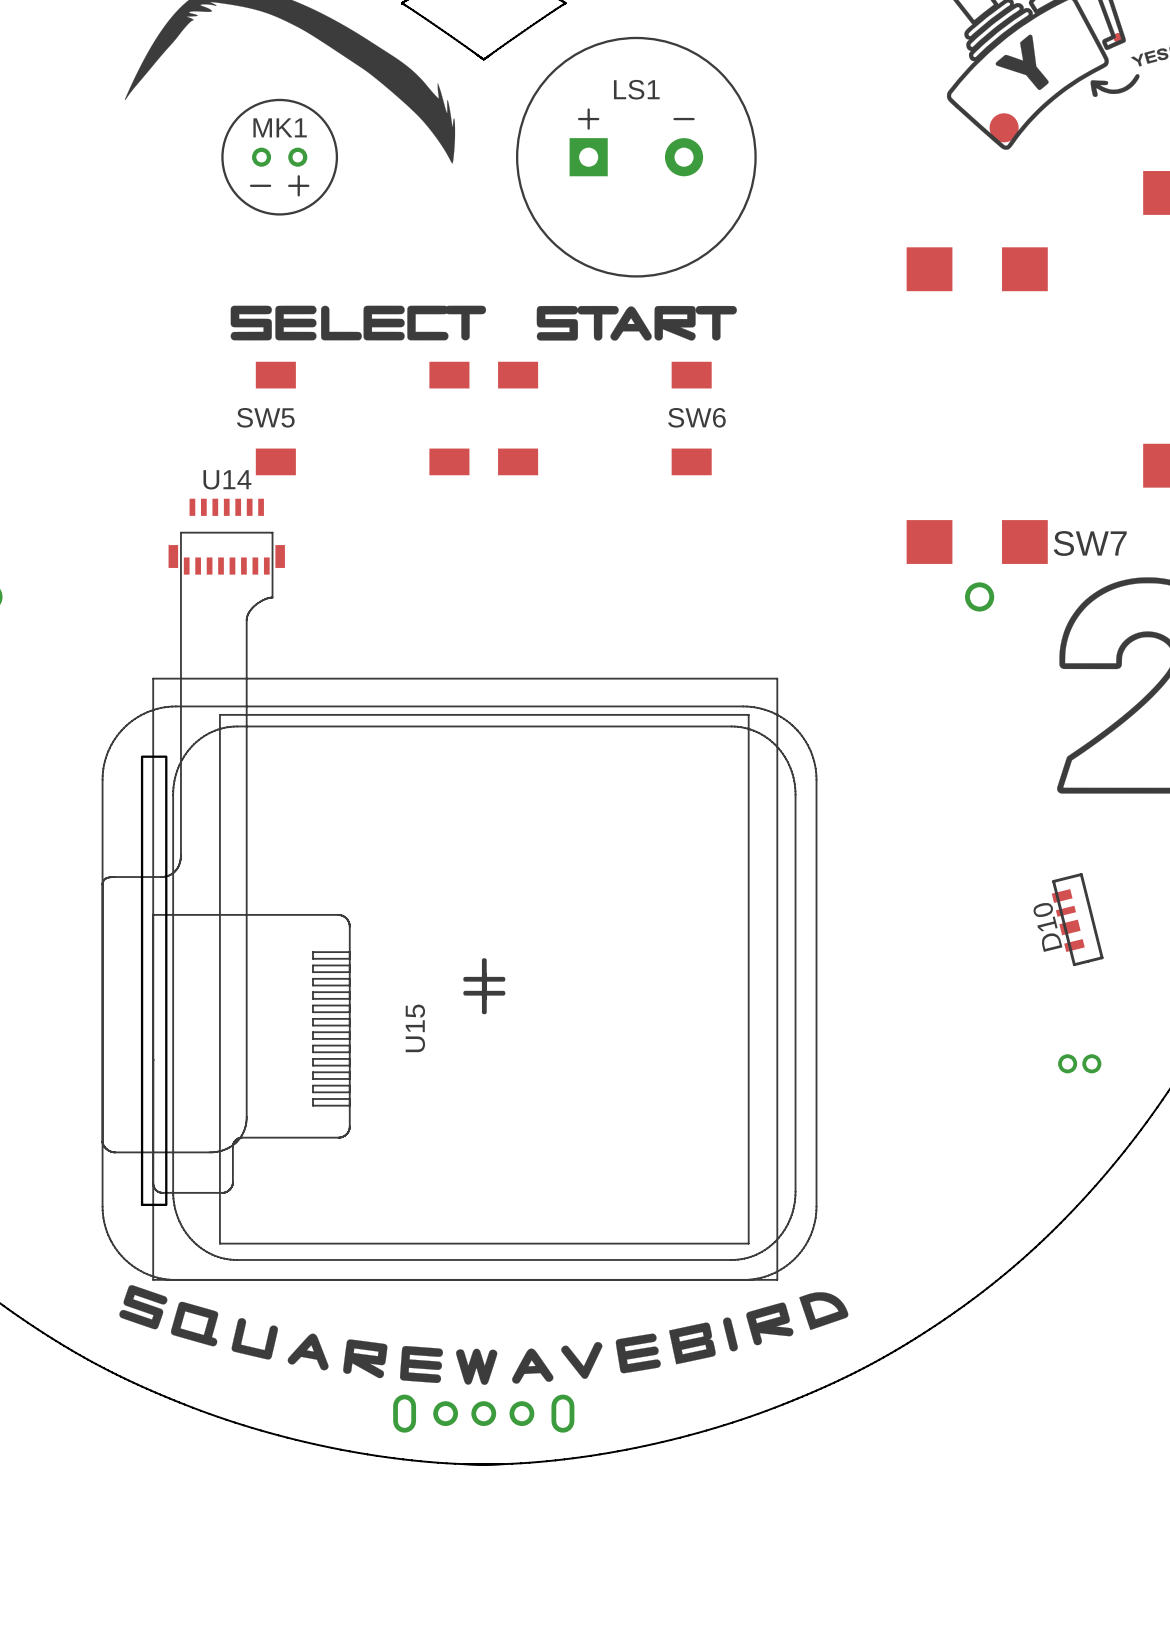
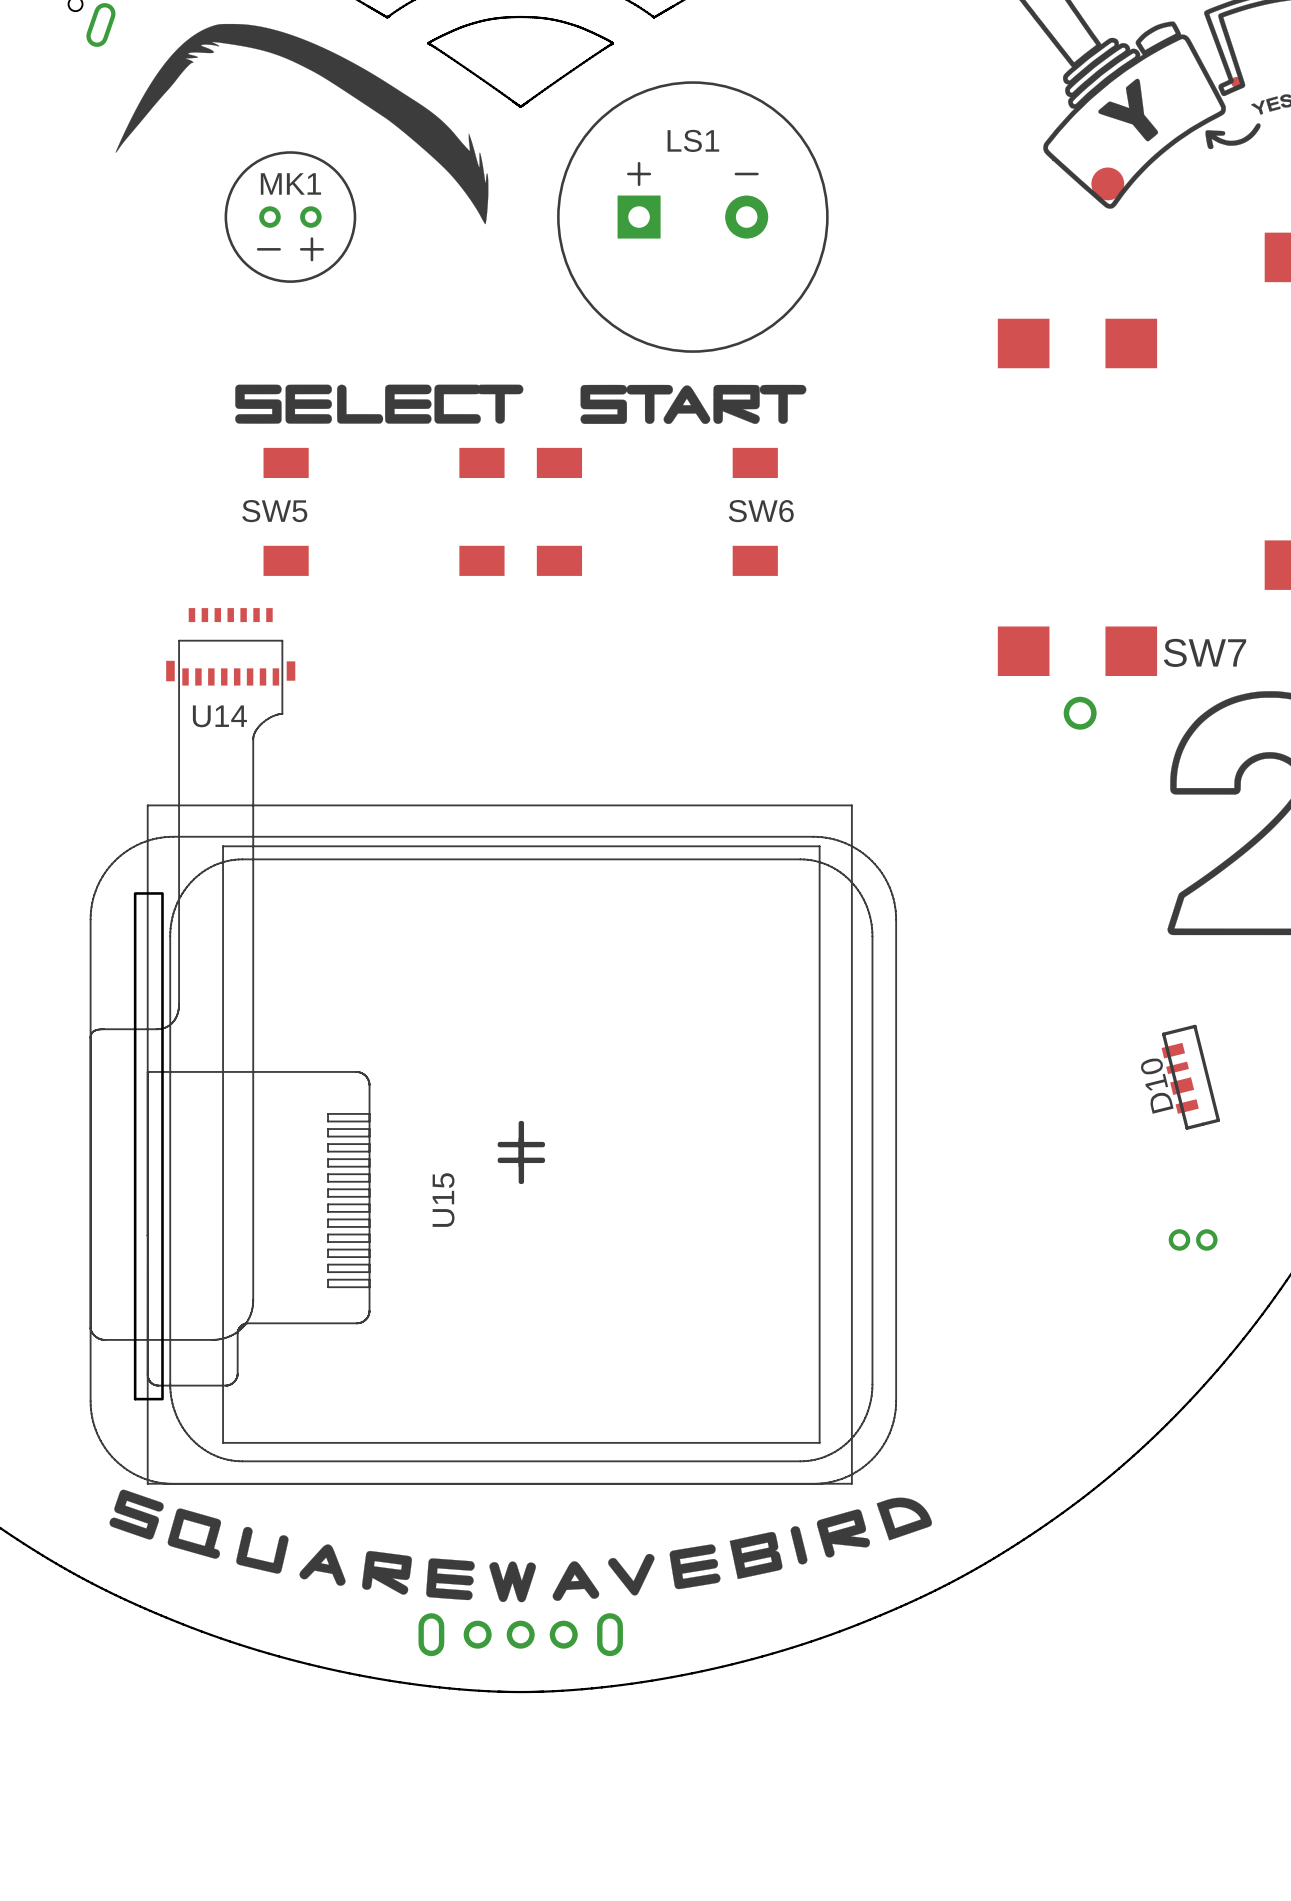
U14 name position: U14 (227, 479) -> U14 (219, 716)
U14 footprint: [102, 498, 817, 1281] -> [90, 608, 897, 1485]

